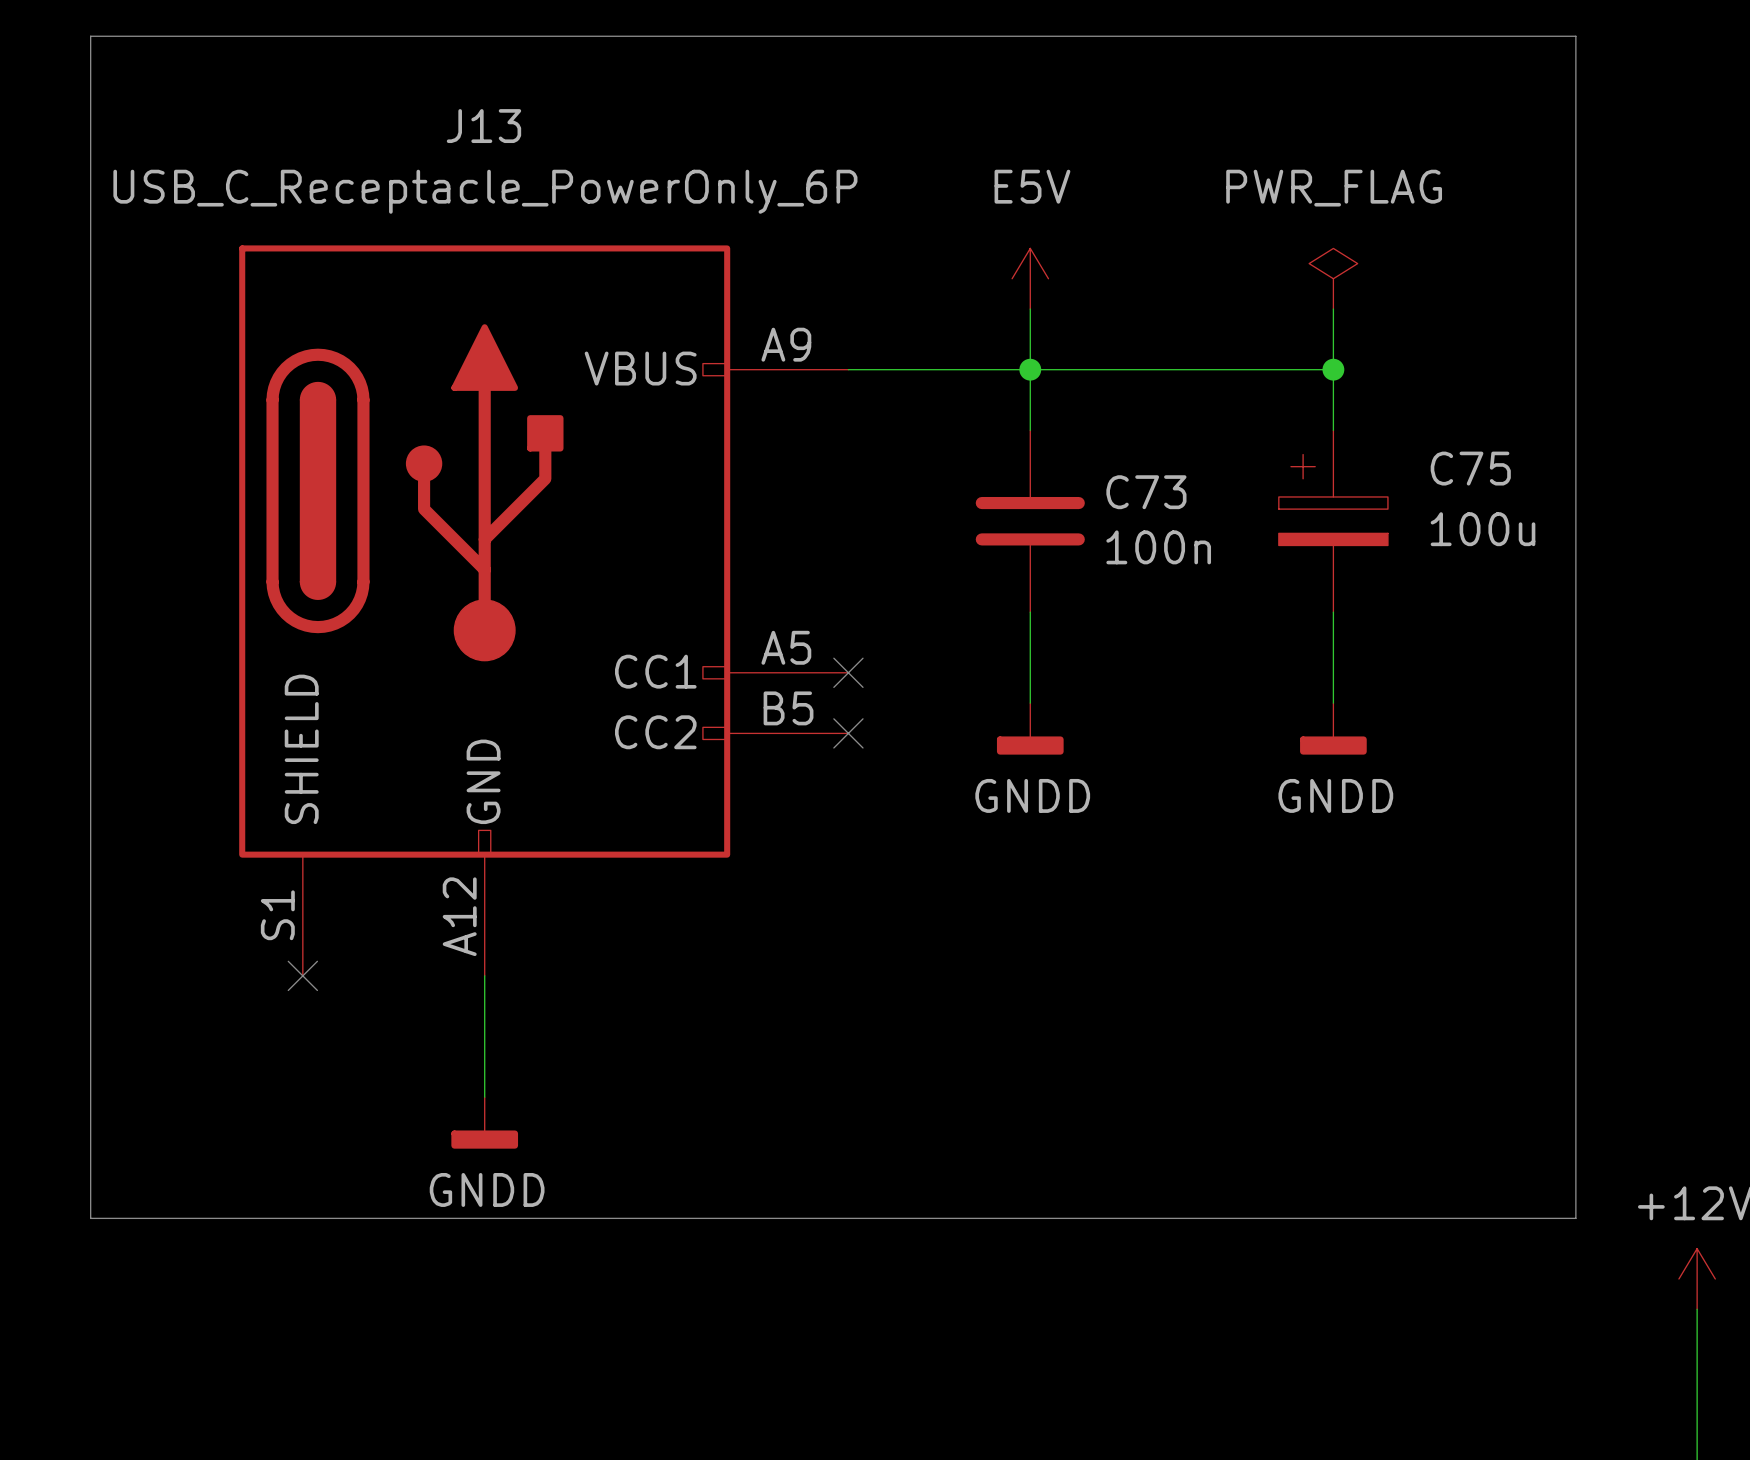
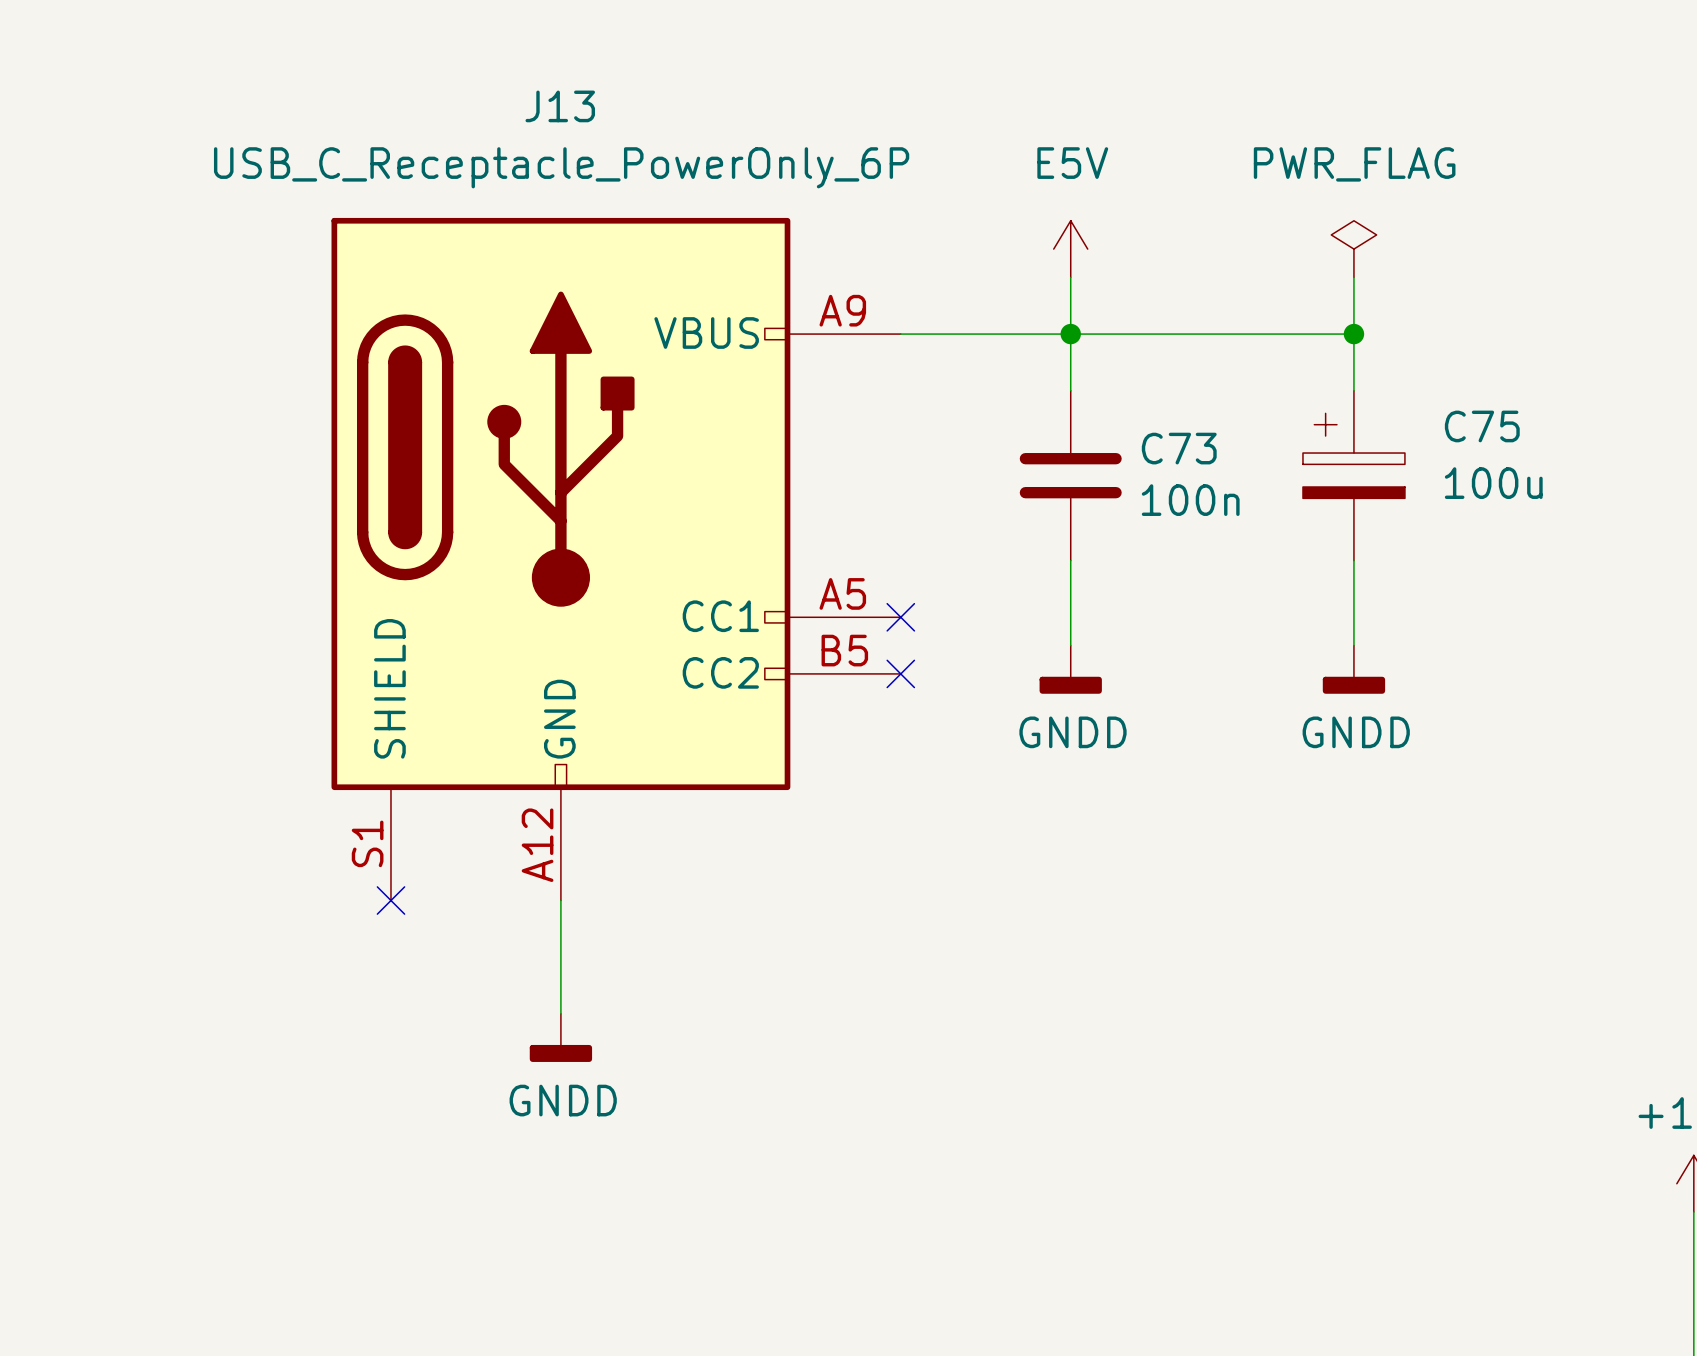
line: (90, 36) (1575, 36) (1575, 1218) (90, 1218) (90, 36) -> none

